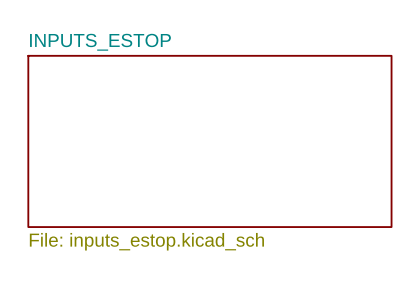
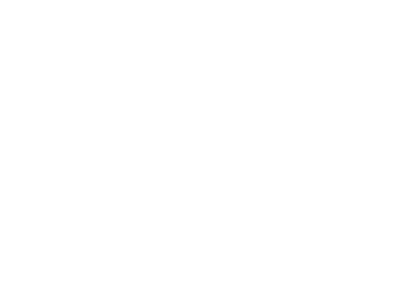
sheet INPUTS_ESTOP: File: inputs_estop.kicad_sch (209, 141) -> none

